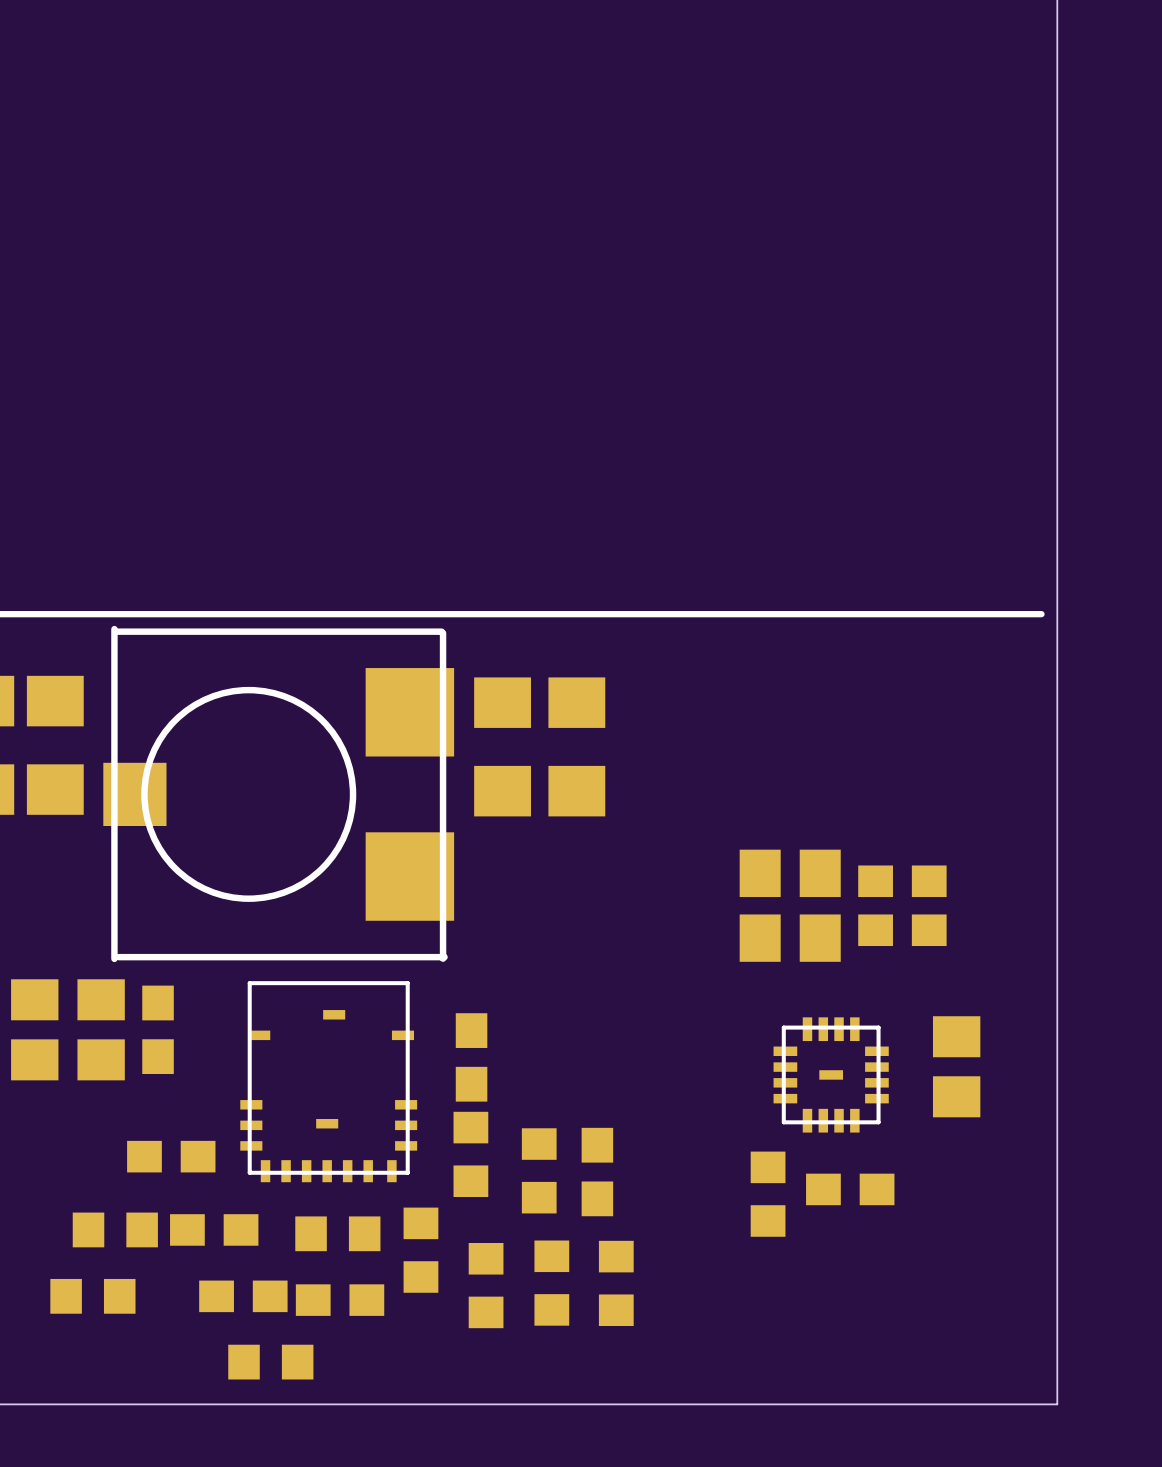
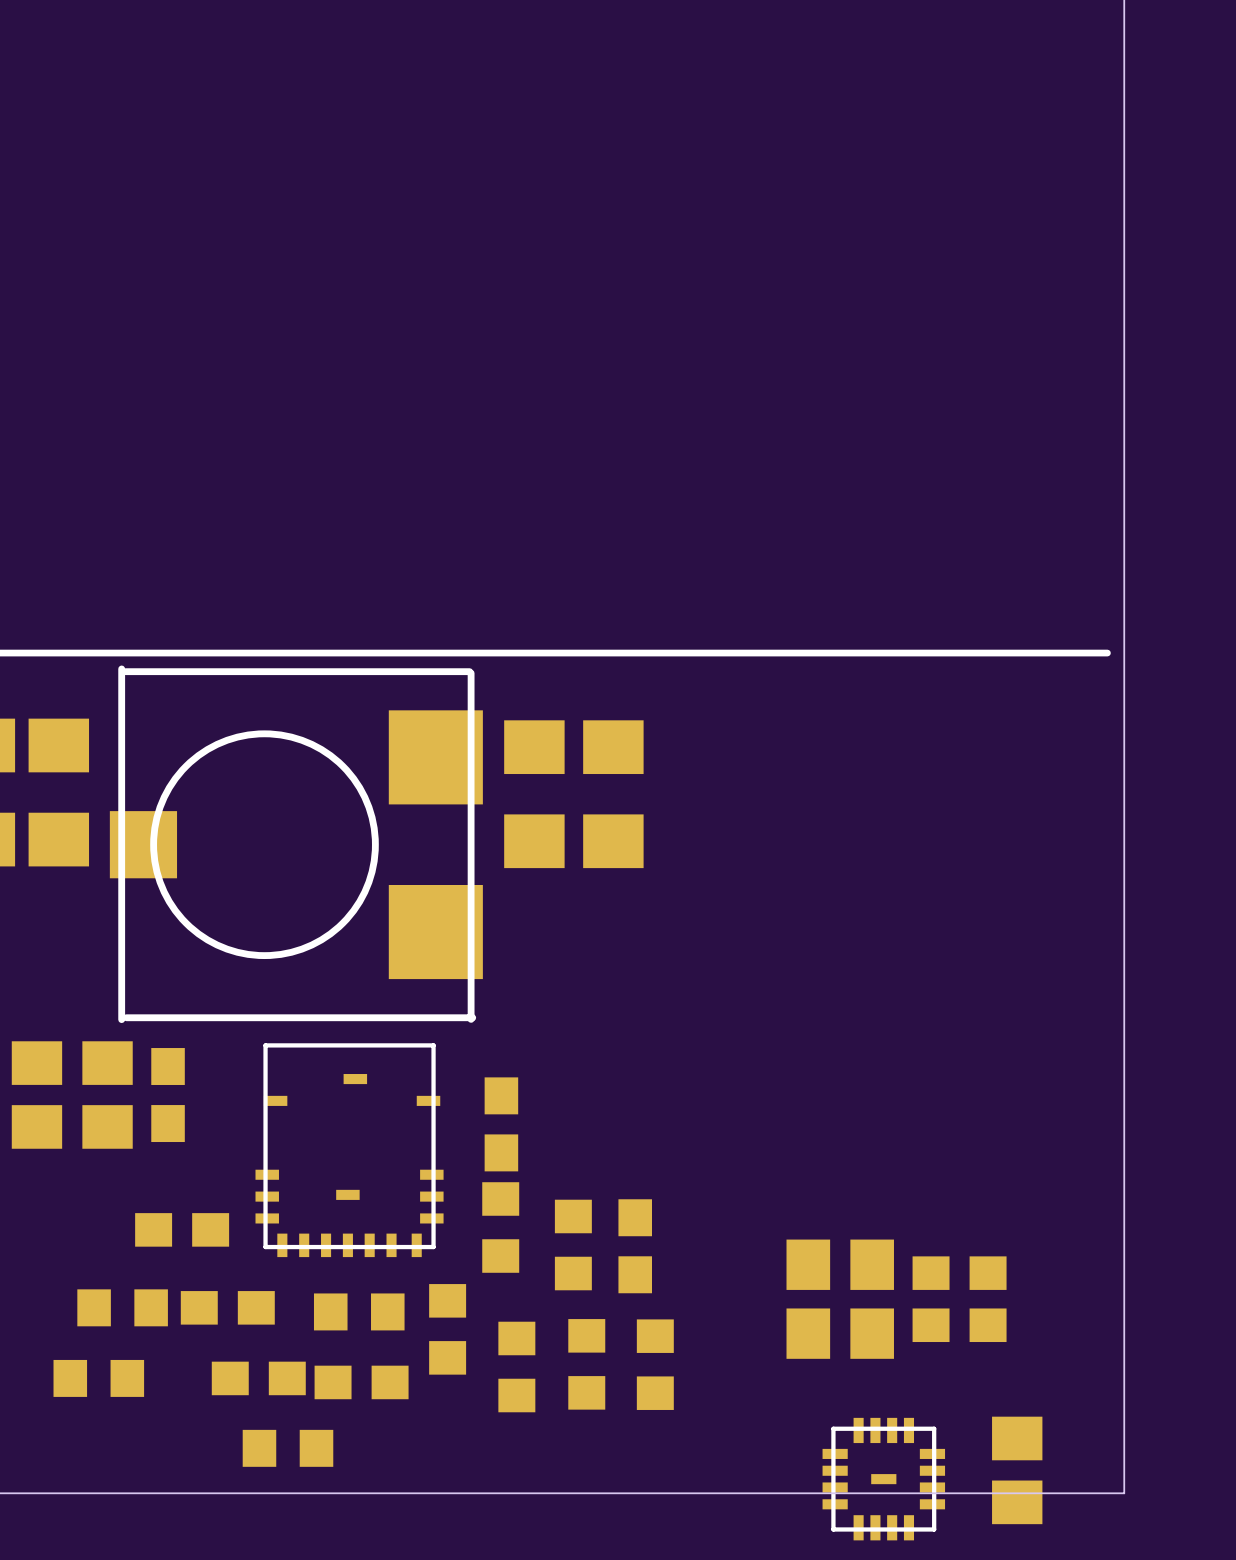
part: (790, 873) -> none
part: (902, 881) -> none
part: (902, 930) -> none
part: (790, 938) -> none
part: (956, 1066) -> none
part position: (831, 1074) -> (883, 1479)
part footprint: [750, 1151, 786, 1237] -> [786, 1239, 894, 1290]
part: (850, 1189) -> none
part: none -> (959, 1273)
part: none -> (959, 1325)
part: none -> (840, 1333)
part: none -> (1017, 1470)

